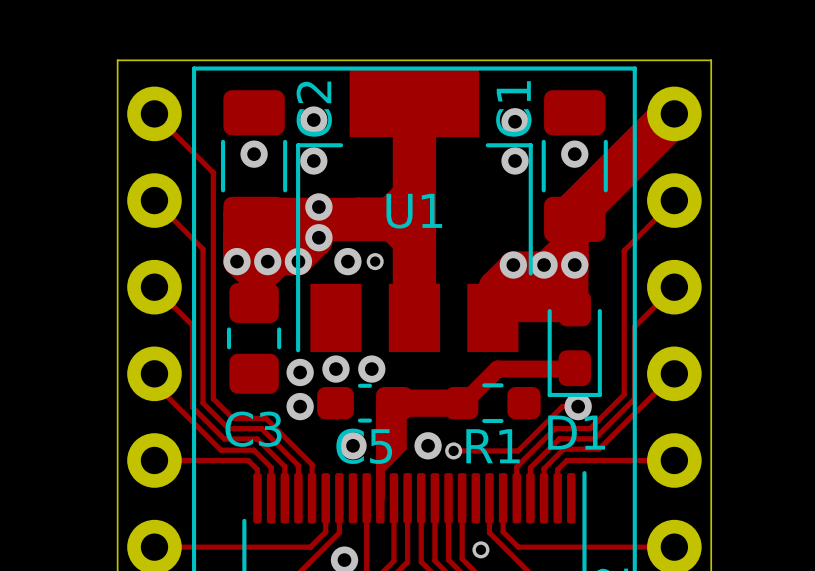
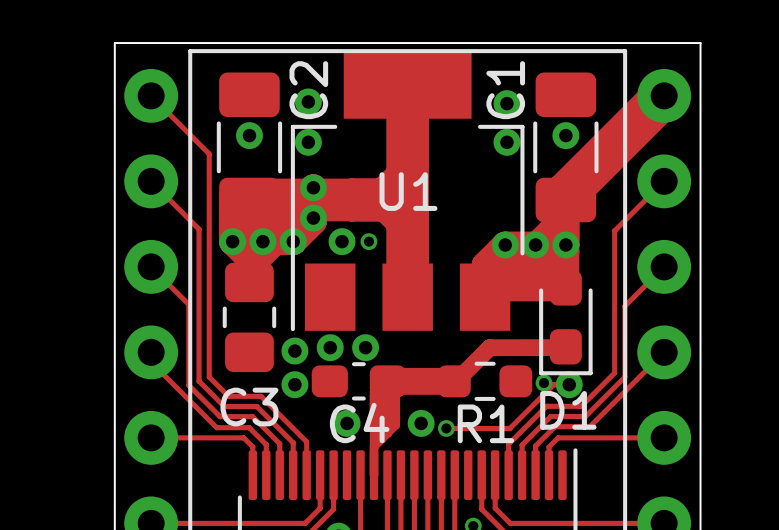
via: none -> (544, 383)
C5 name: C5 (364, 446) -> C4 (359, 423)

